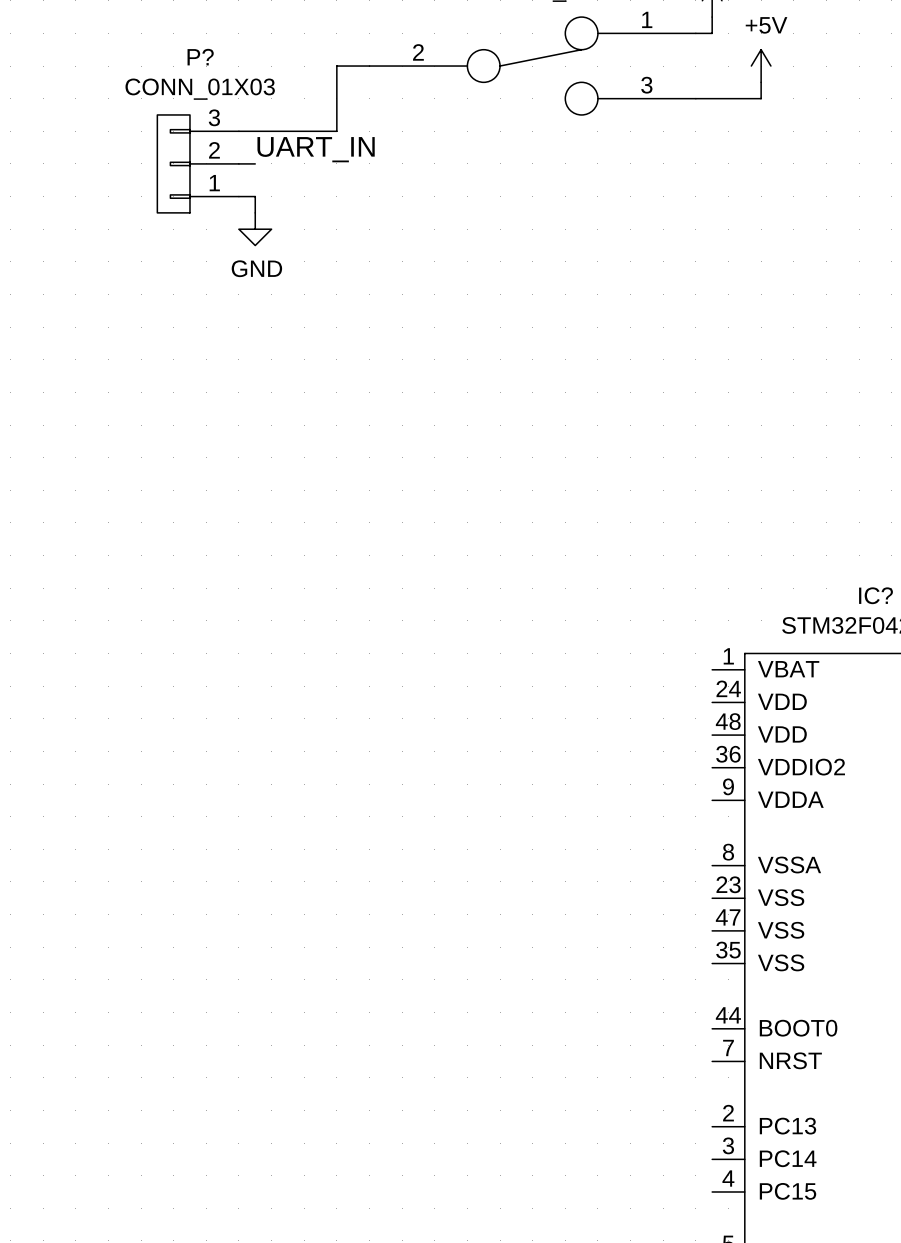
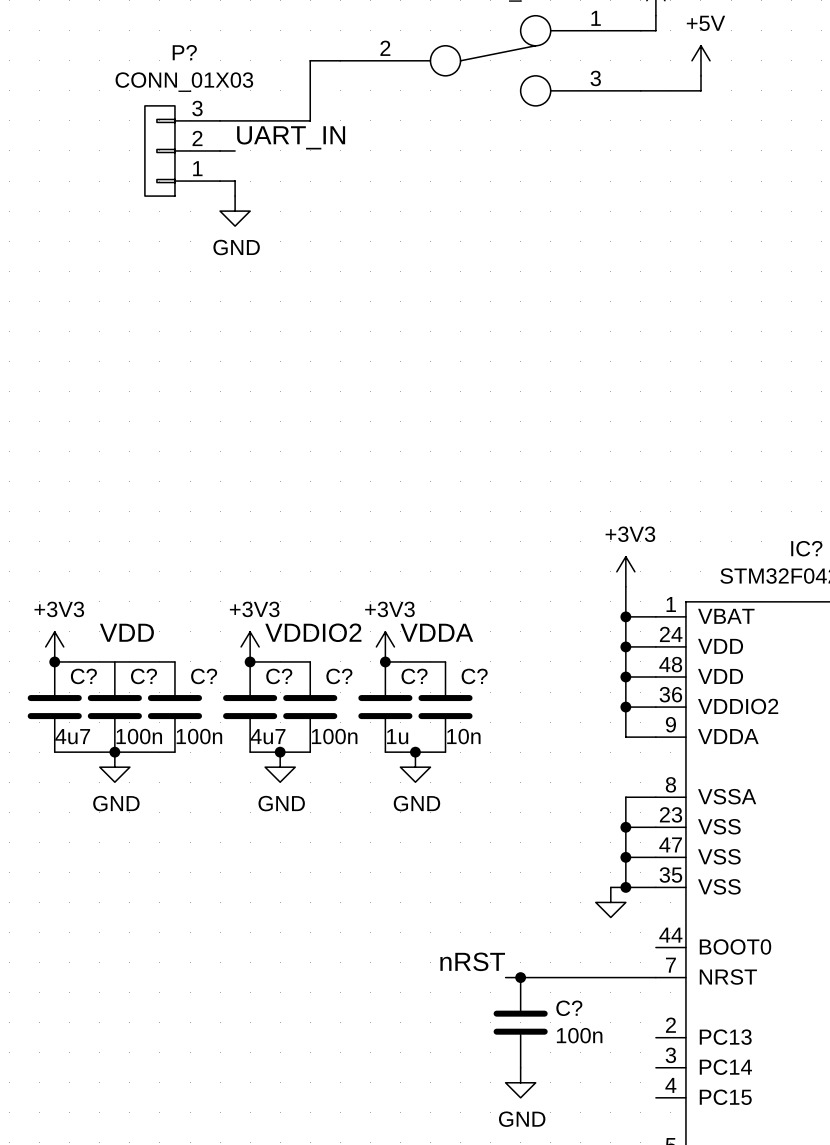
power symbol: none -> +3V3 (625, 571)
wire: none -> (625, 586) (625, 737) (655, 737)
wire: none -> (625, 616) (655, 616)
junction: none -> (625, 616)
text: none -> VDD (126, 632)
text: none -> VDDIO2 (313, 632)
text: none -> VDDA (436, 632)
power symbol: none -> +3V3 (54, 646)
power symbol: none -> +3V3 (250, 646)
power symbol: none -> +3V3 (385, 646)
wire: none -> (625, 646) (655, 646)
junction: none -> (625, 646)
wire: none -> (54, 661) (174, 661)
junction: none -> (54, 661)
wire: none -> (250, 661) (310, 661)
junction: none -> (250, 661)
wire: none -> (385, 661) (445, 661)
junction: none -> (385, 661)
wire: none -> (625, 677) (655, 677)
junction: none -> (625, 677)
C?: none -> 4u7 (54, 707)
C?: none -> 100n (114, 707)
C?: none -> 100n (174, 707)
C?: none -> 4u7 (250, 707)
C?: none -> 100n (310, 707)
C?: none -> 1u (385, 707)
C?: none -> 10n (445, 707)
wire: none -> (625, 707) (655, 707)
junction: none -> (625, 707)
wire: none -> (54, 752) (174, 752)
junction: none -> (114, 752)
wire: none -> (250, 752) (310, 752)
junction: none -> (280, 752)
wire: none -> (385, 752) (445, 752)
junction: none -> (415, 752)
power symbol: none -> GND (114, 767)
power symbol: none -> GND (280, 767)
power symbol: none -> GND (415, 767)
wire: none -> (655, 797) (625, 797) (625, 887)
wire: none -> (625, 827) (655, 827)
junction: none -> (625, 827)
wire: none -> (625, 857) (655, 857)
junction: none -> (625, 857)
wire: none -> (610, 887) (655, 887)
junction: none -> (625, 887)
power symbol: none -> (610, 902)
label: none -> nRST (472, 961)
wire: none -> (505, 977) (655, 977)
junction: none -> (520, 977)
C?: none -> 100n (520, 1022)
power symbol: none -> GND (520, 1082)

